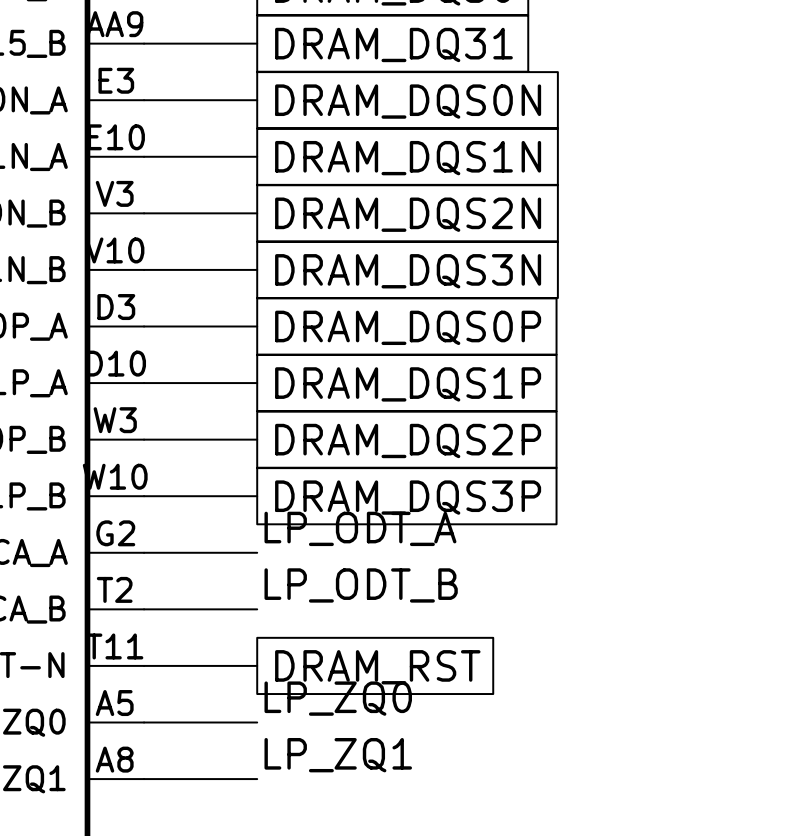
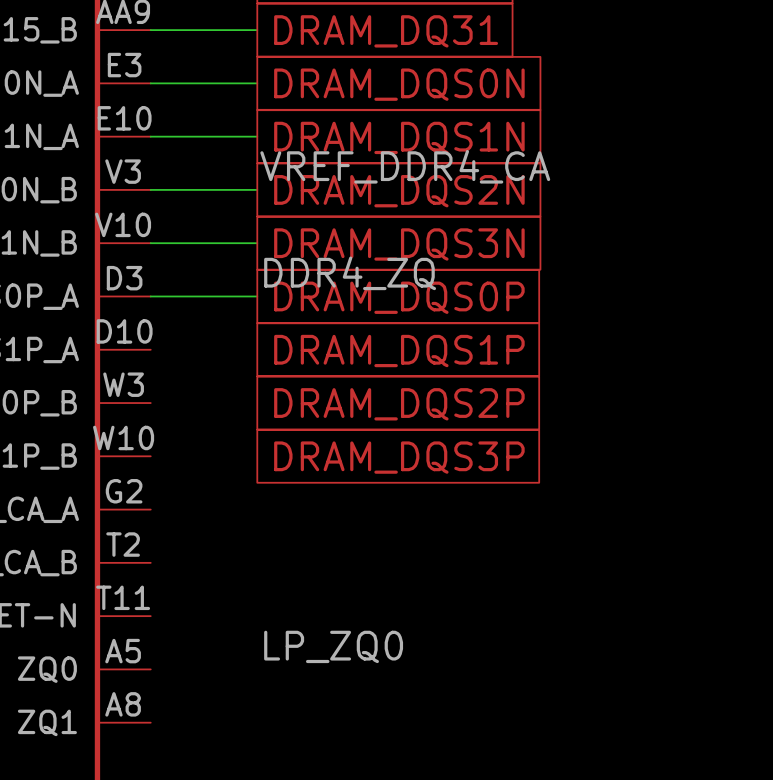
label: none -> VREF_DDR4_CA (405, 166)
label: none -> DDR4_ZQ (350, 273)
wire: (144, 383) (257, 383) -> none
wire: (144, 439) (257, 439) -> none
wire: (144, 496) (257, 496) -> none
label: LP_ODT_A (360, 528) -> none
wire: (144, 552) (257, 552) -> none
label: LP_ODT_B (361, 585) -> none
wire: (144, 609) (257, 609) -> none
wire: (144, 665) (257, 665) -> none
global label: DRAM_RST (377, 667) -> none
wire: (144, 722) (257, 722) -> none
label: LP_ZQ1 (338, 755) -> none
wire: (144, 779) (257, 779) -> none

